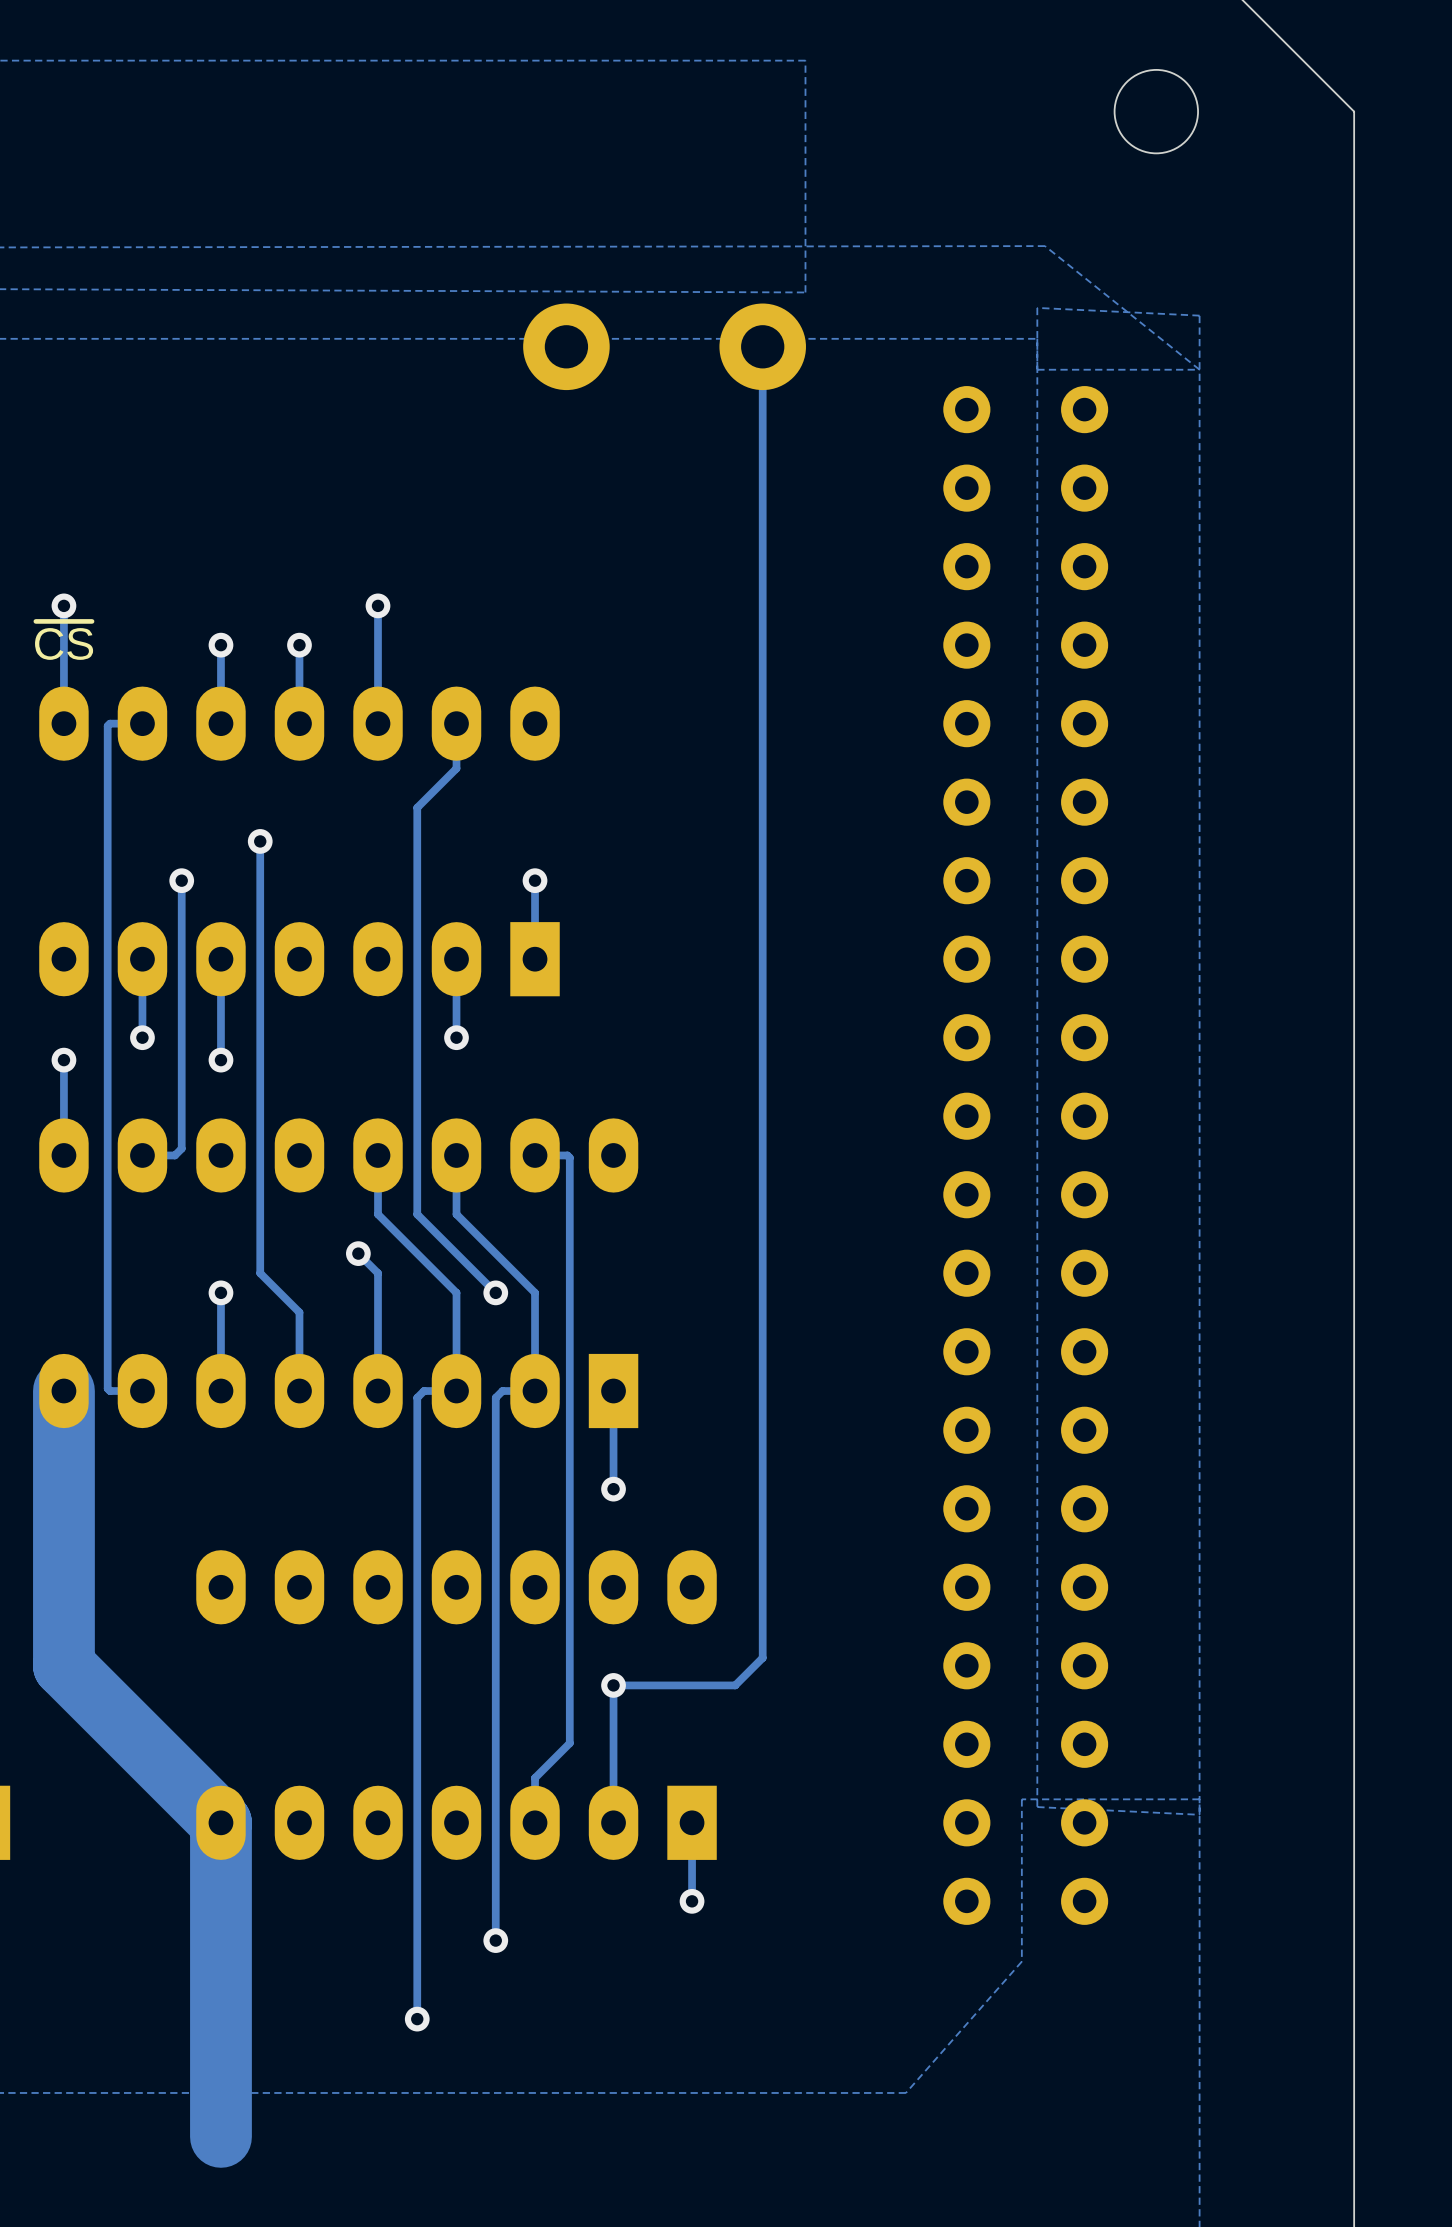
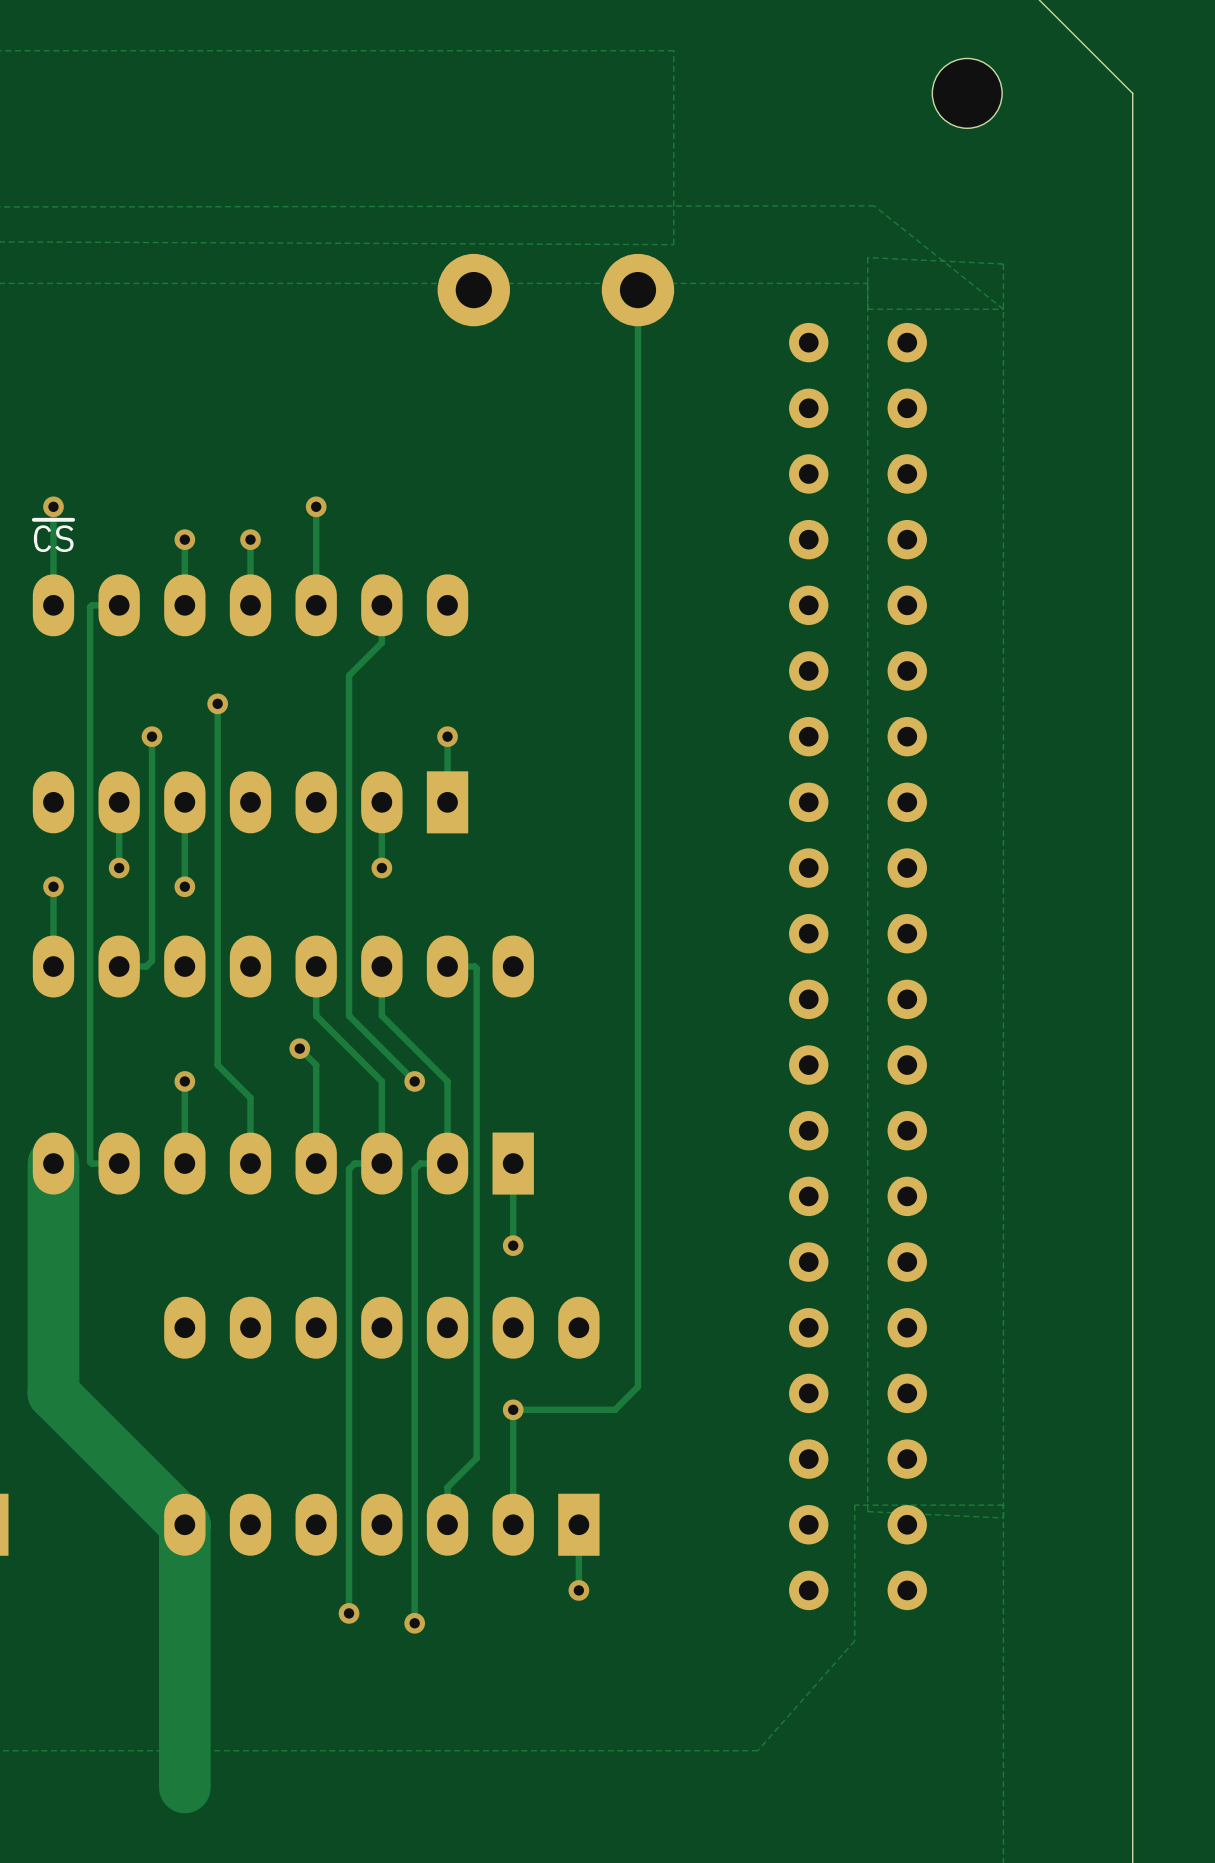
track: (417, 1928) (417, 2019) -> none
via position: (417, 2019) -> (349, 1613)

